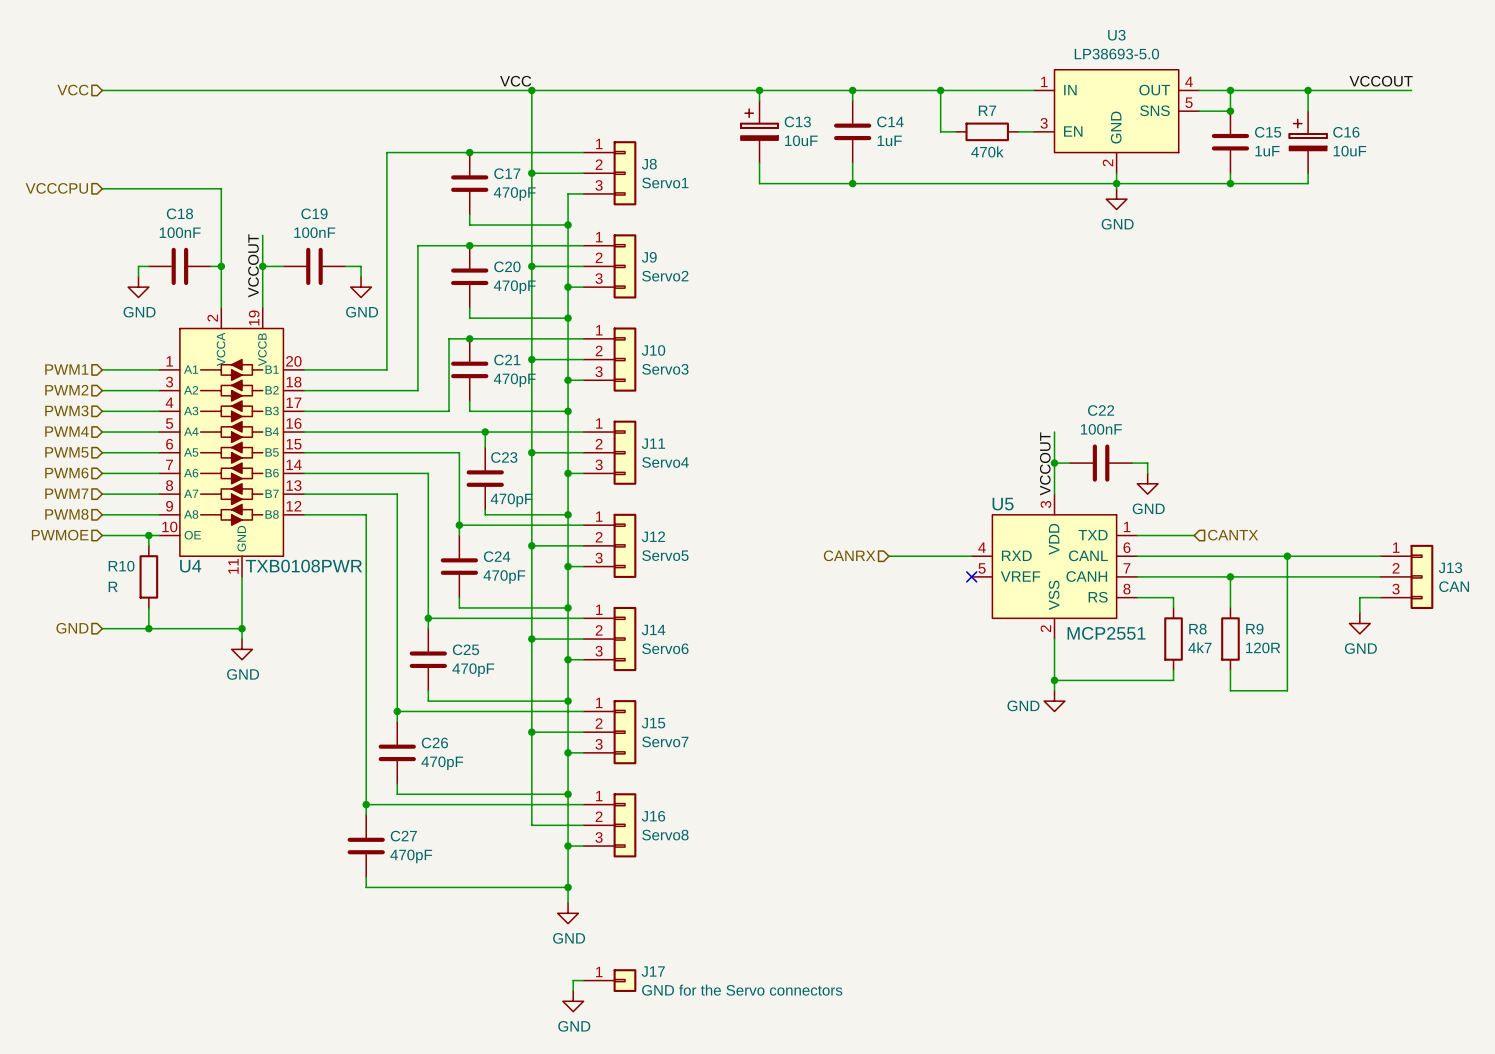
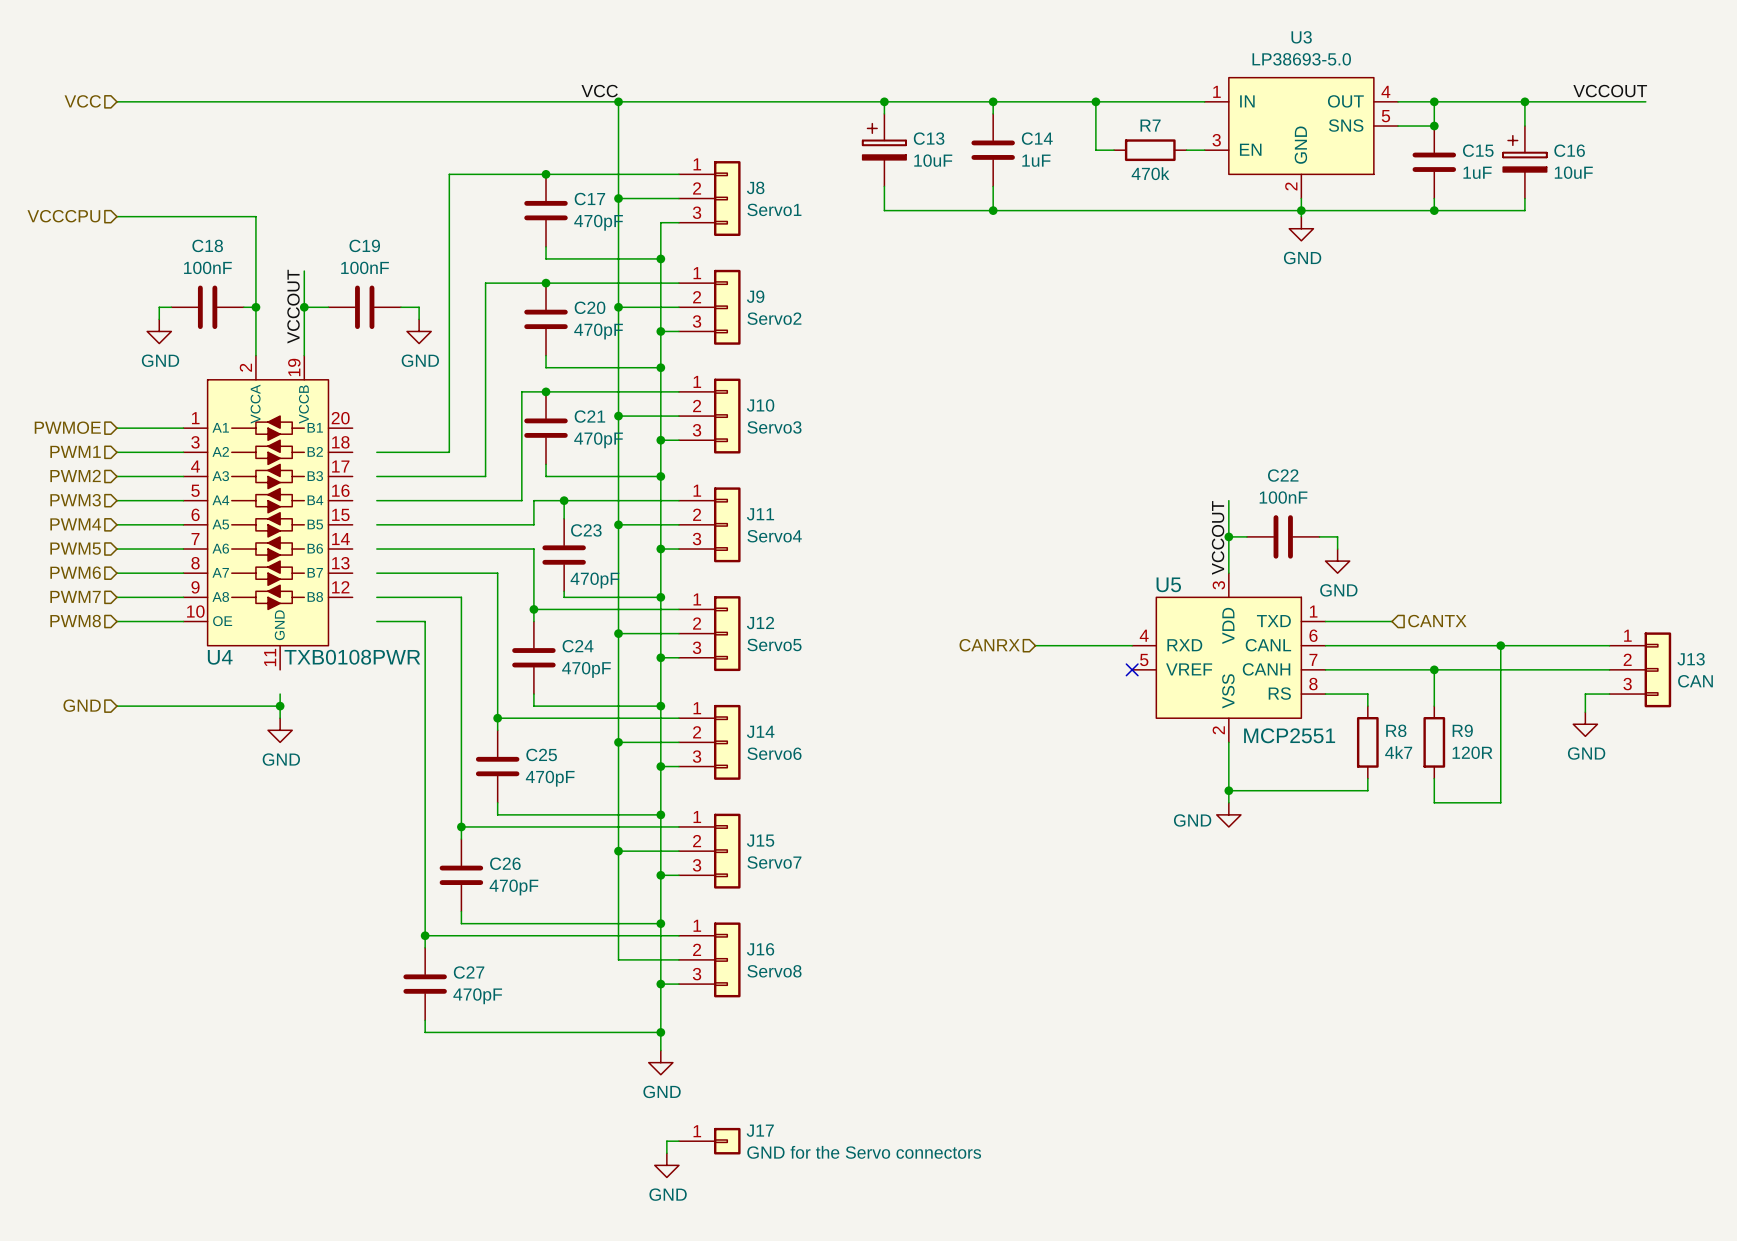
hierarchical label: PWM1 (66, 369) -> PWMOE (67, 427)
wire: (304, 369) (386, 369) -> (449, 452) (449, 428)
hierarchical label: PWM2 (66, 390) -> PWM1 (75, 451)
wire: (304, 390) (324, 390) -> none
wire: (386, 390) (417, 390) -> (485, 476) (485, 452)
hierarchical label: PWM3 (66, 410) -> PWM2 (75, 475)
wire: (304, 411) (324, 411) -> none
wire: (417, 411) (449, 411) -> (521, 500) (521, 476)
hierarchical label: PWM4 (66, 431) -> PWM3 (75, 500)
wire: (304, 432) (324, 432) -> none
wire: (449, 432) (459, 432) -> (533, 524) (533, 500)
hierarchical label: PWM5 (66, 452) -> PWM4 (75, 524)
wire: (304, 452) (324, 452) -> none
wire: (459, 452) (459, 473) -> none
hierarchical label: PWM6 (66, 473) -> PWM5 (75, 548)
wire: (304, 473) (324, 473) -> none
wire: (428, 473) (428, 494) -> (497, 549) (533, 549)
hierarchical label: PWM7 (66, 493) -> PWM6 (75, 572)
wire: (304, 494) (324, 494) -> none
wire: (397, 494) (397, 514) -> (425, 597) (461, 597)
wire: none -> (461, 573) (497, 573)
hierarchical label: PWM8 (66, 514) -> PWM7 (75, 596)
wire: (304, 514) (324, 514) -> none
wire: (366, 514) (366, 535) -> (376, 621) (425, 621)
hierarchical label: PWMOE (60, 535) -> PWM8 (75, 621)
wire: (148, 535) (148, 545) -> none
junction: (148, 535) -> none
R10: R (148, 576) -> none
wire: (242, 576) (242, 597) -> none
wire: (148, 607) (148, 628) -> none
hierarchical label position: GND (72, 628) -> GND (82, 705)
wire: (102, 628) (242, 628) -> (116, 706) (280, 706)
junction: (148, 628) -> none
junction position: (242, 628) -> (280, 706)
power symbol position: GND (242, 649) -> GND (280, 730)

